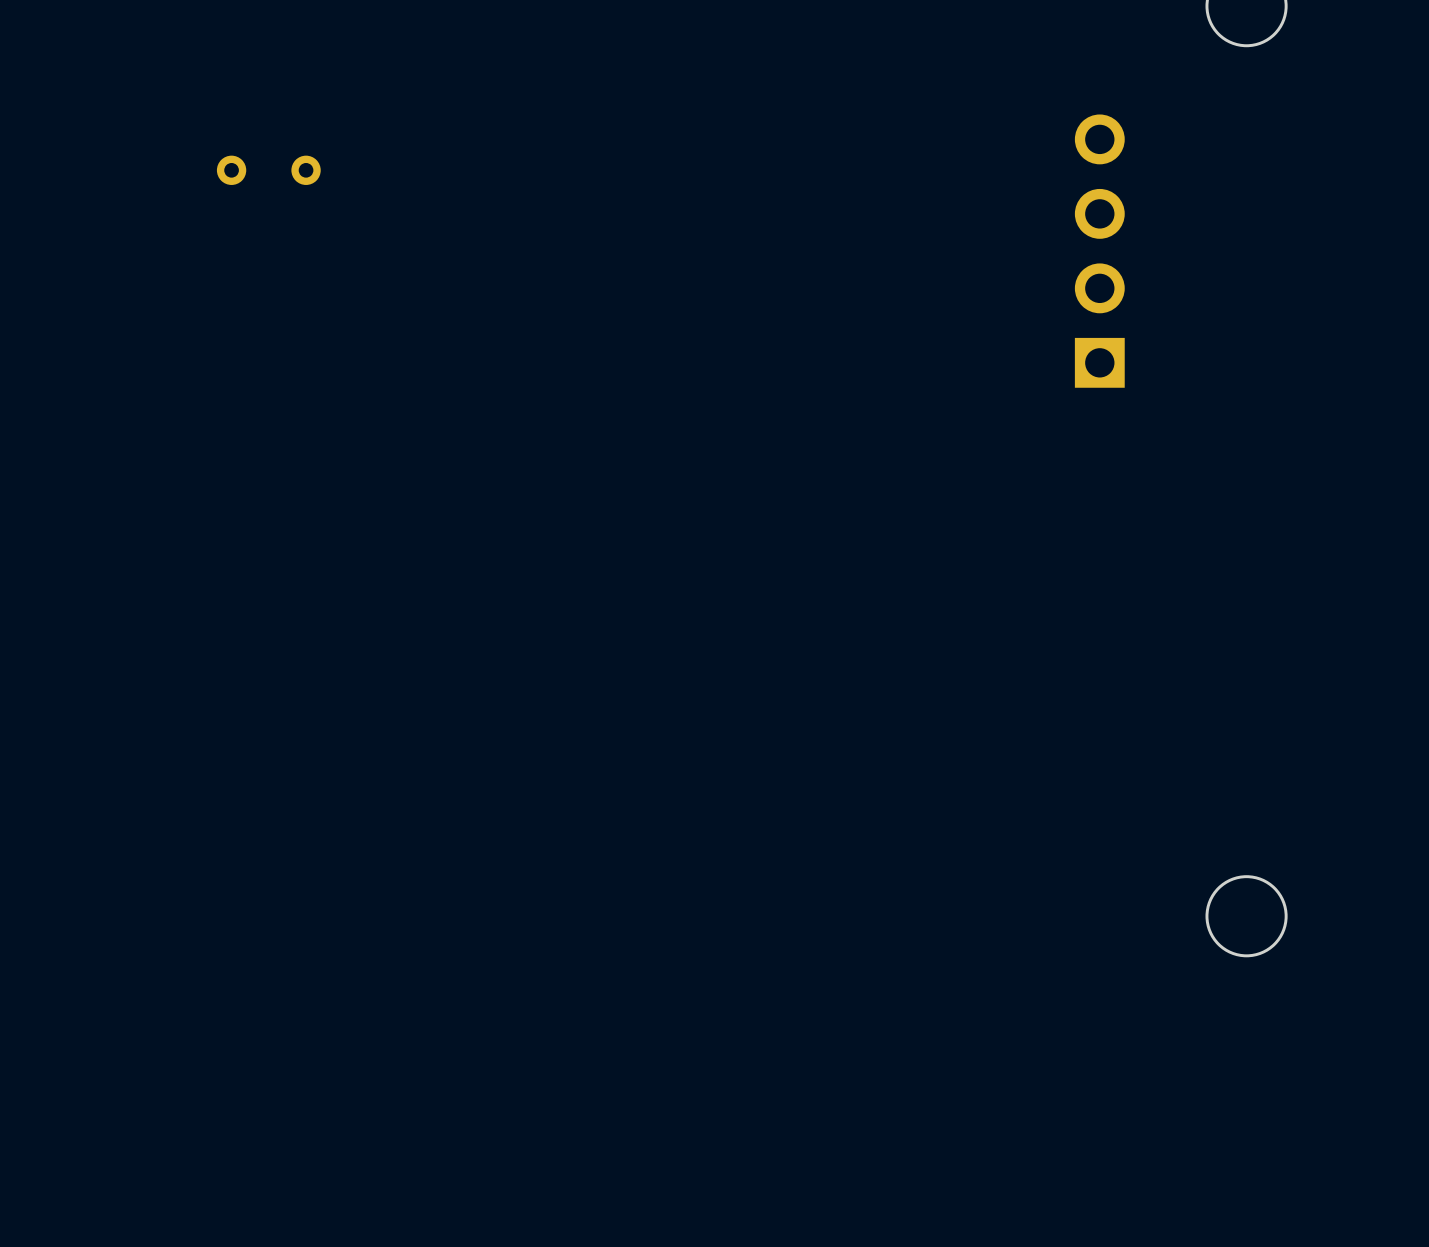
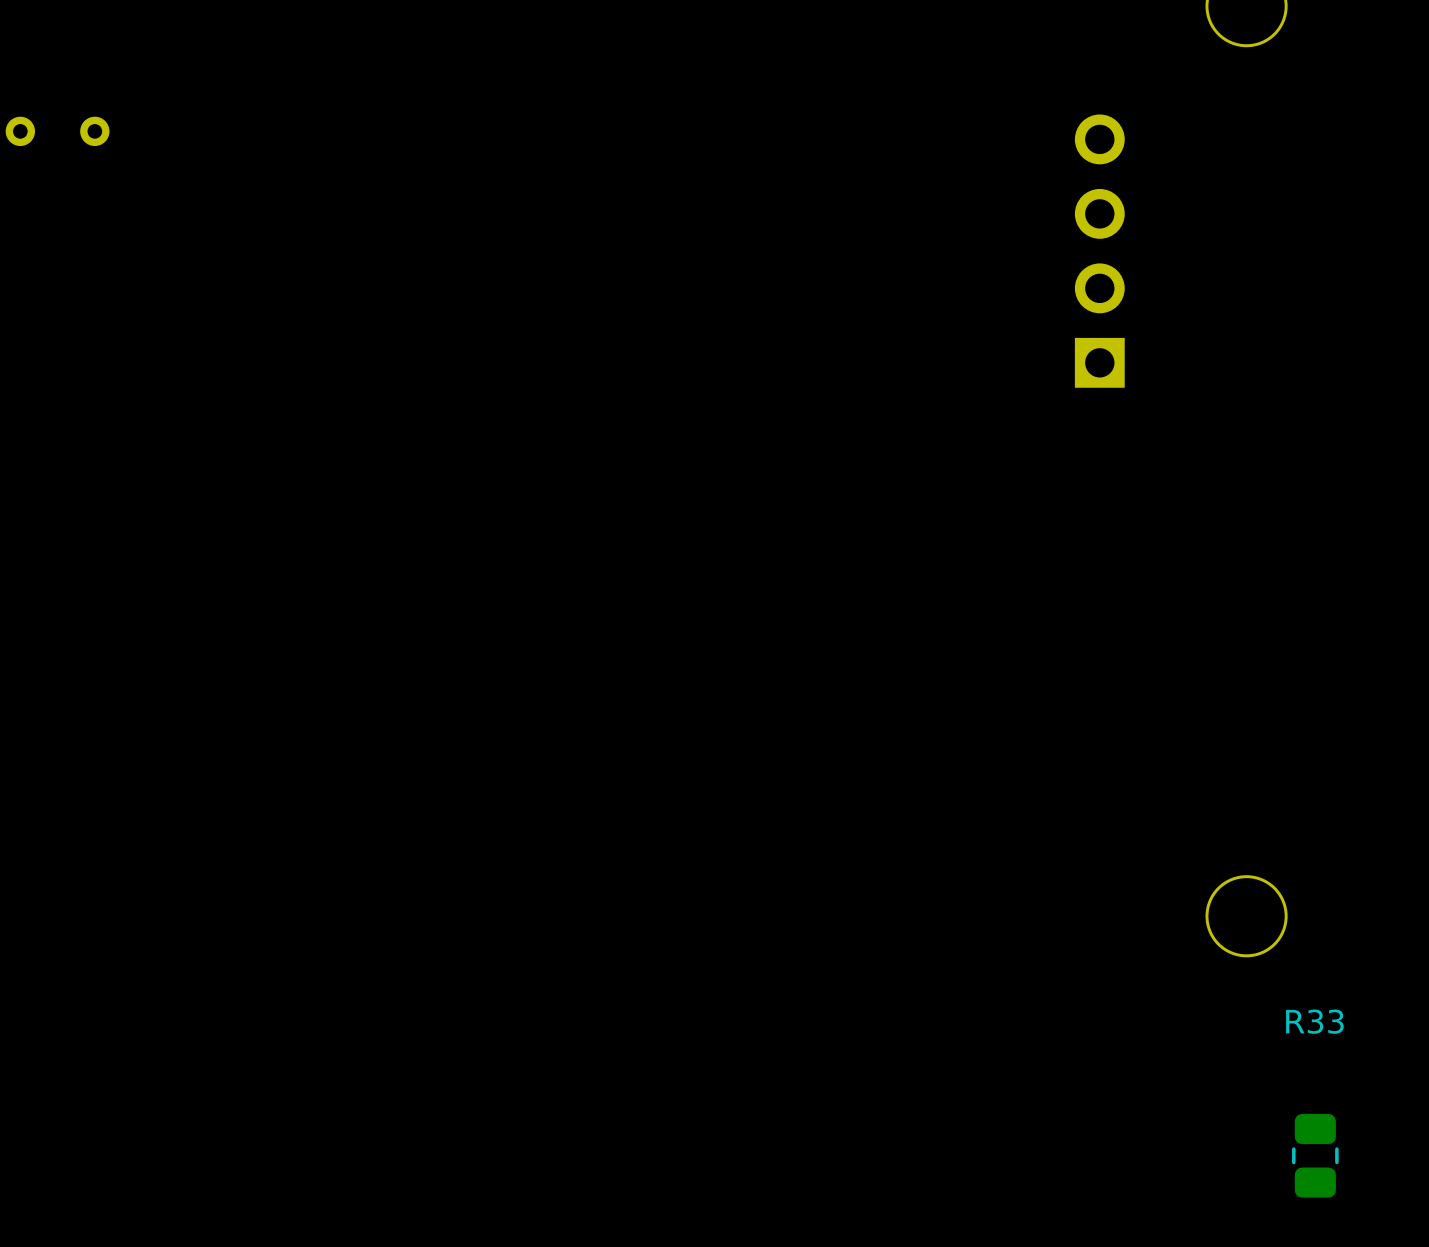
part position: (268, 170) -> (57, 131)
R33: none -> (1315, 1155)

